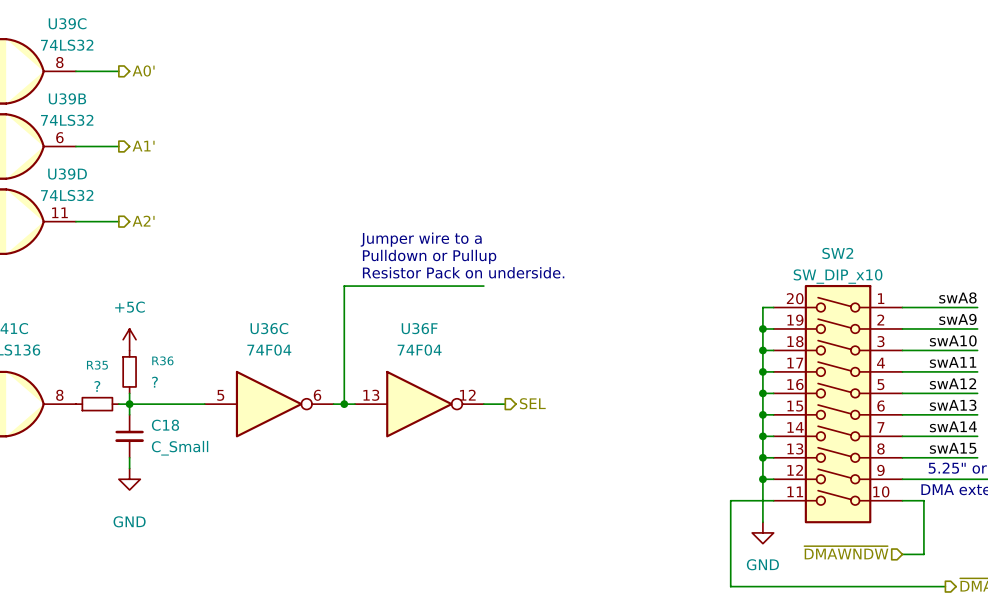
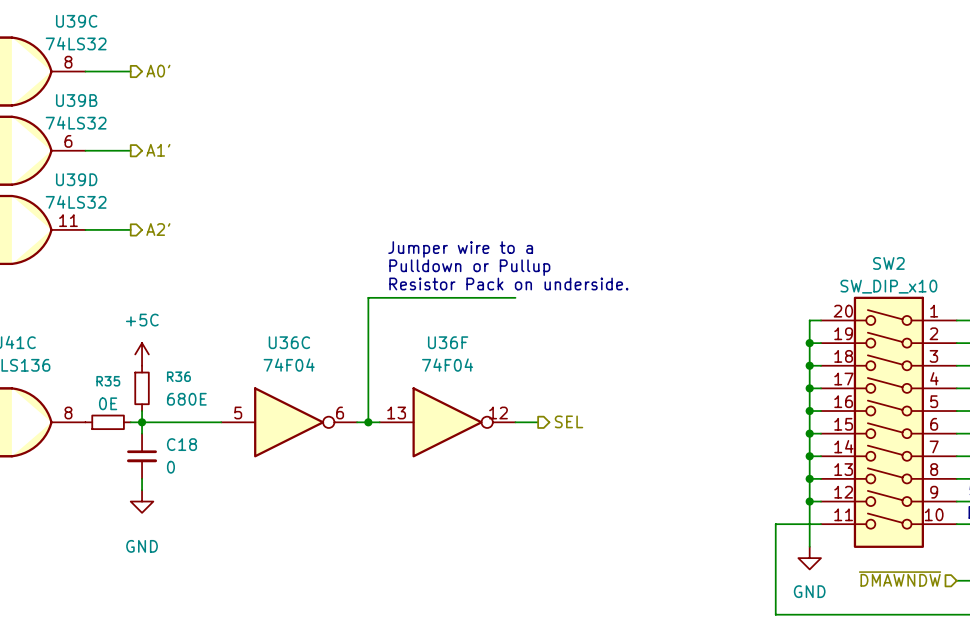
R36 value: ? (154, 382) -> 680E (186, 399)
R35 value: ? (97, 386) -> 0E (108, 403)
C18 value: C_Small (180, 448) -> 0 (170, 467)

